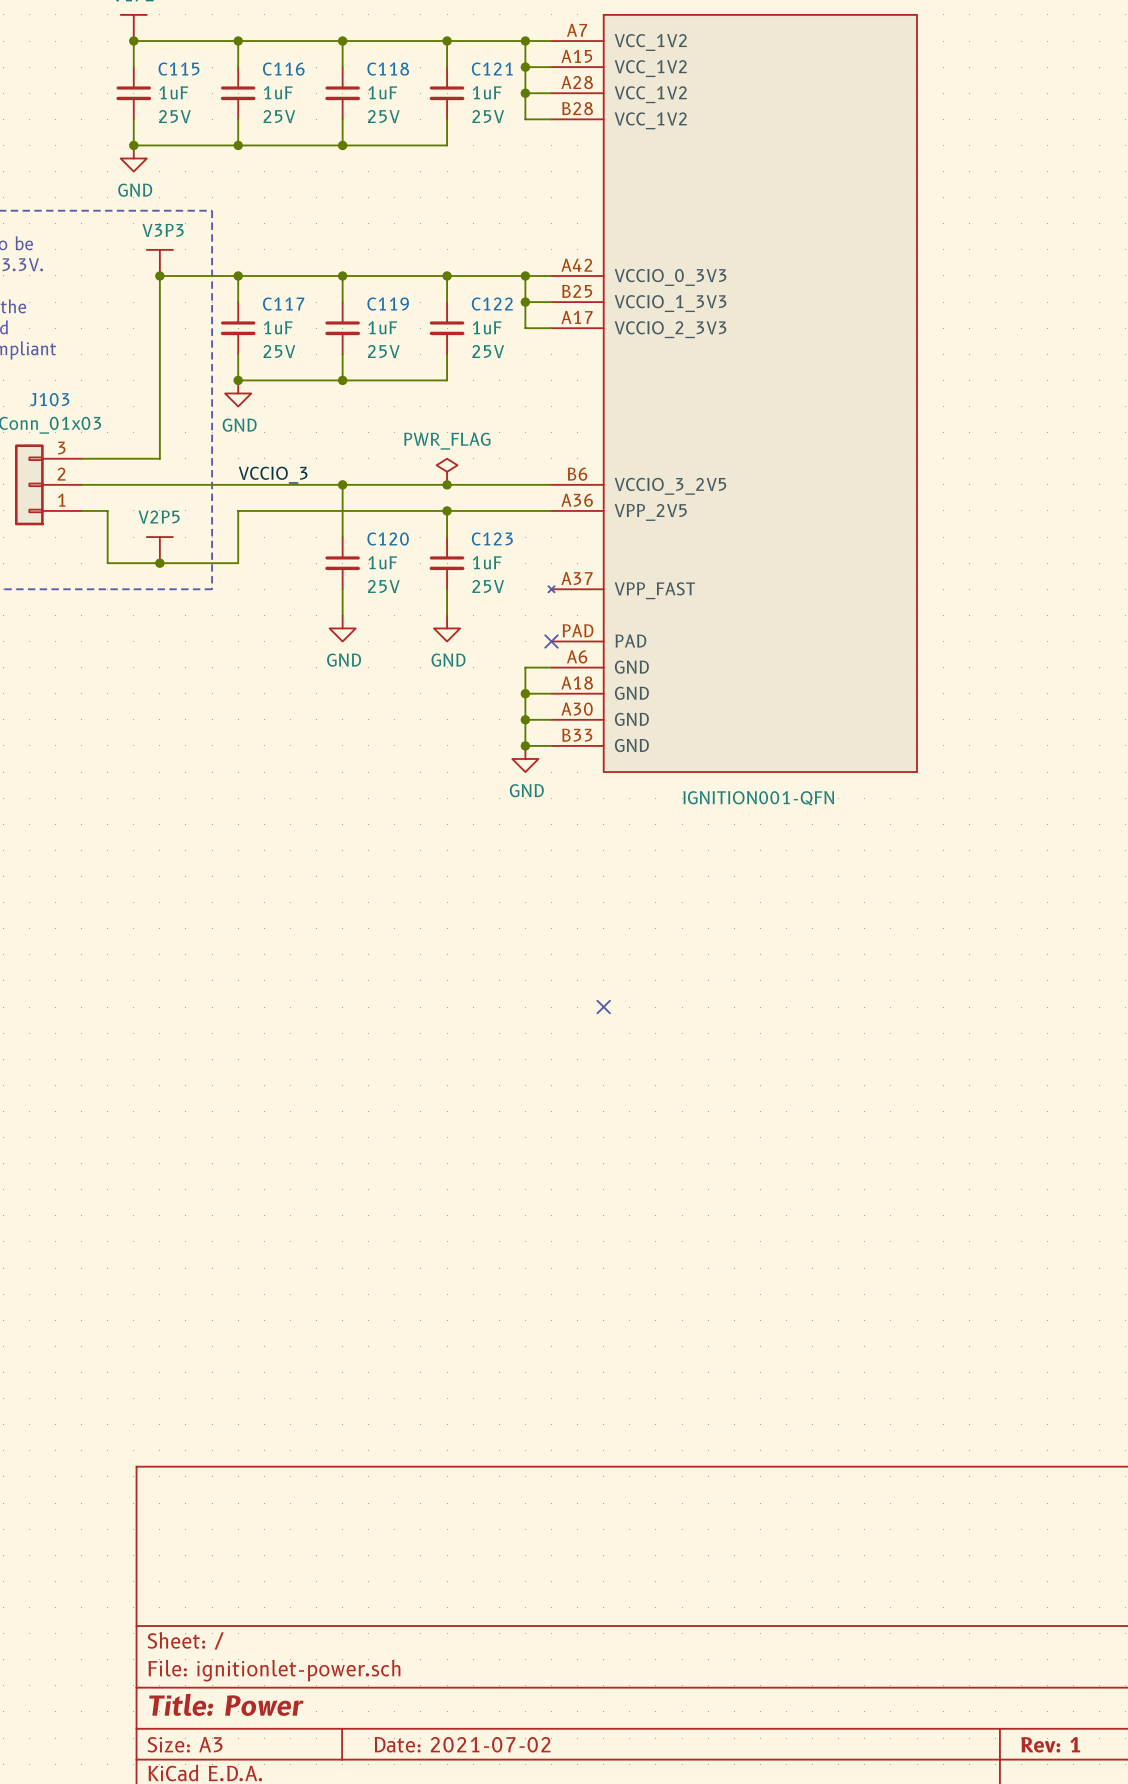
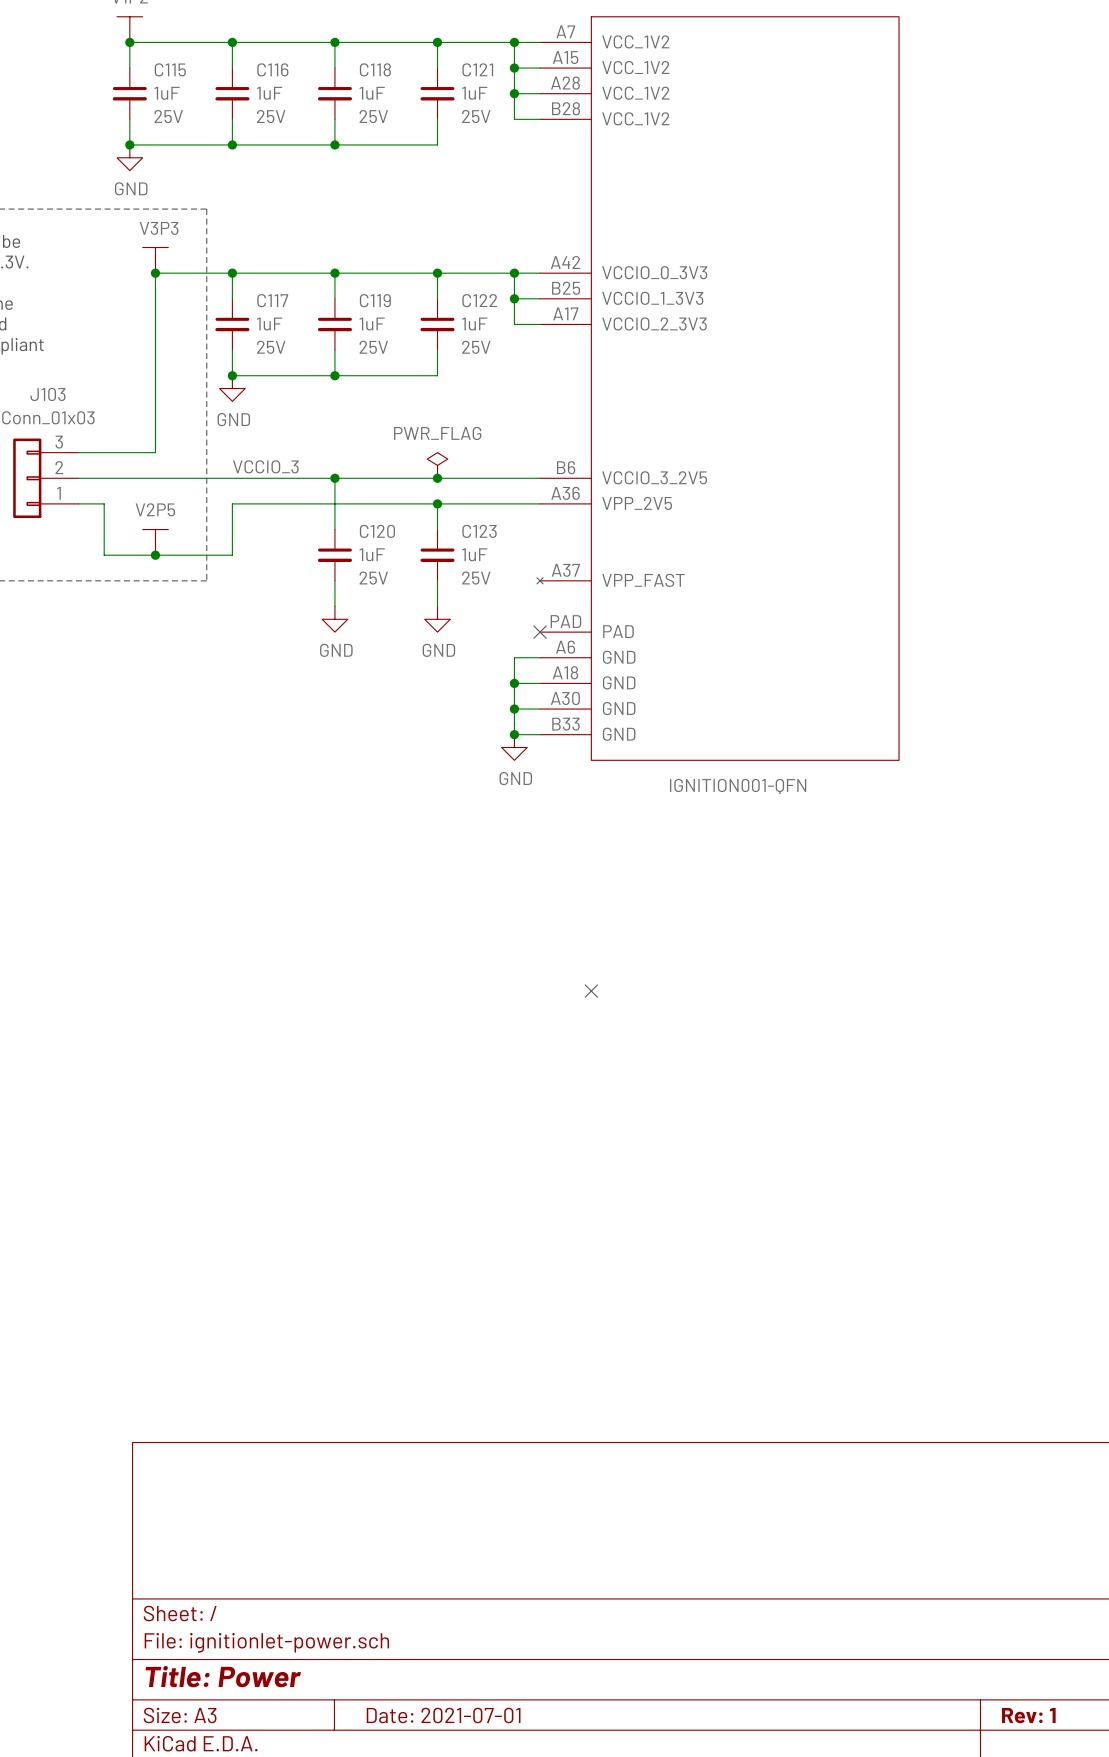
title block: Date: 2021-07-02 (462, 1744) -> Date: 2021-07-01 (443, 1715)

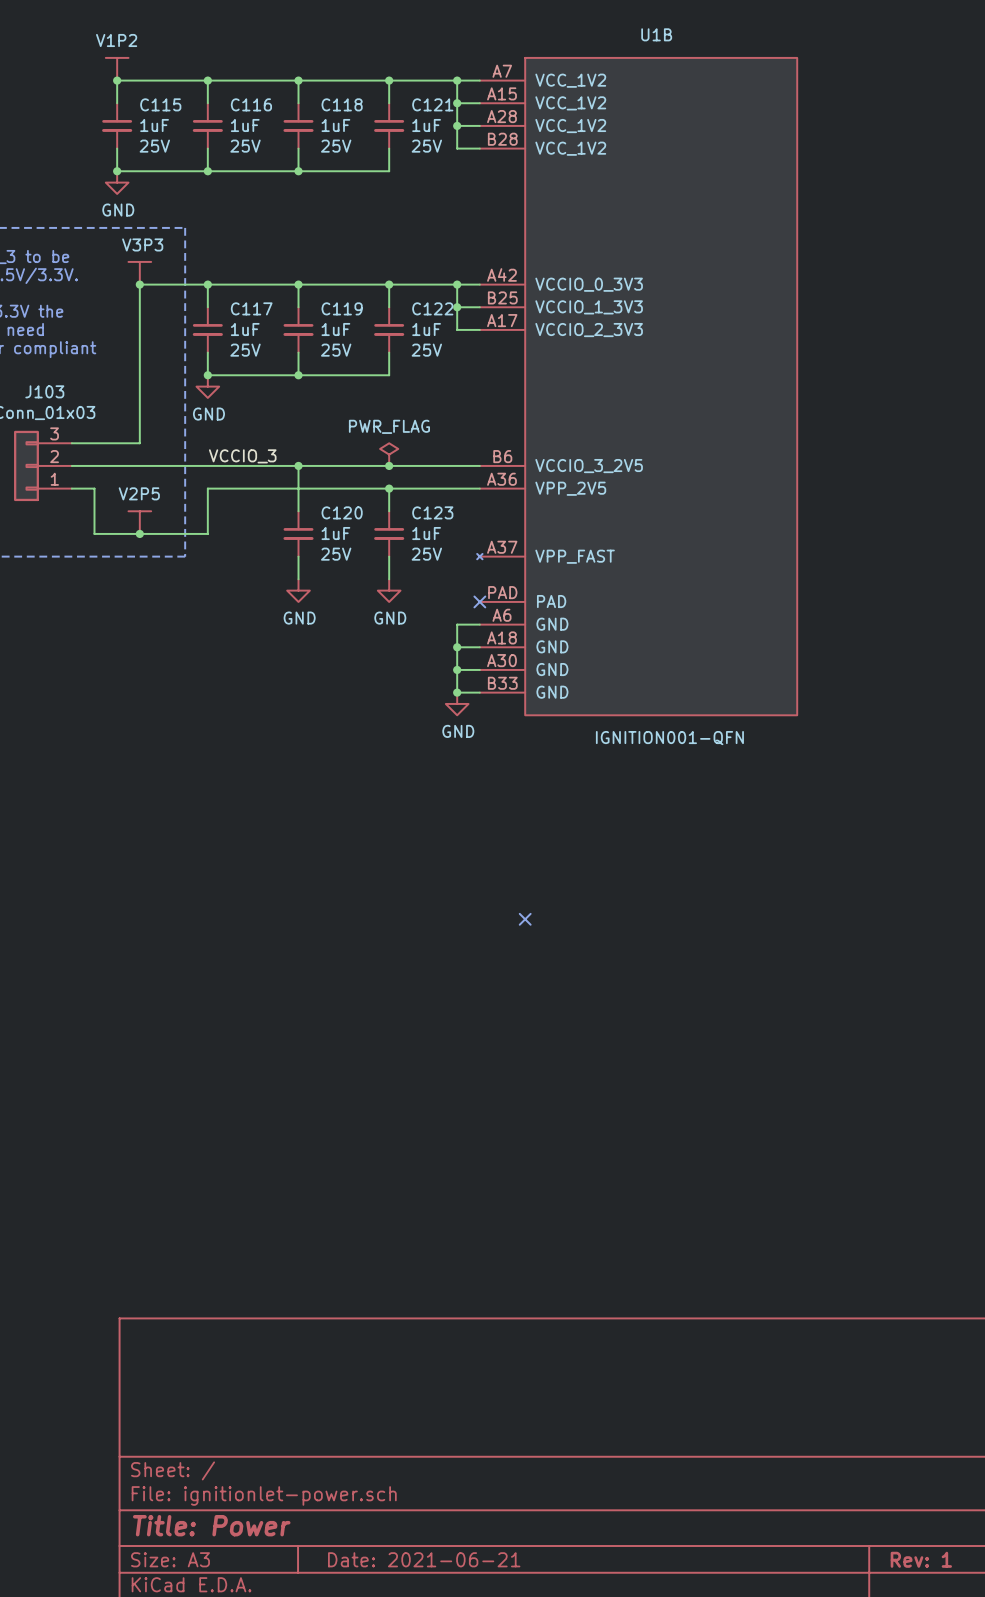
title block: Date: 2021-07-01 (443, 1715) -> Date: 2021-06-21 (424, 1559)

